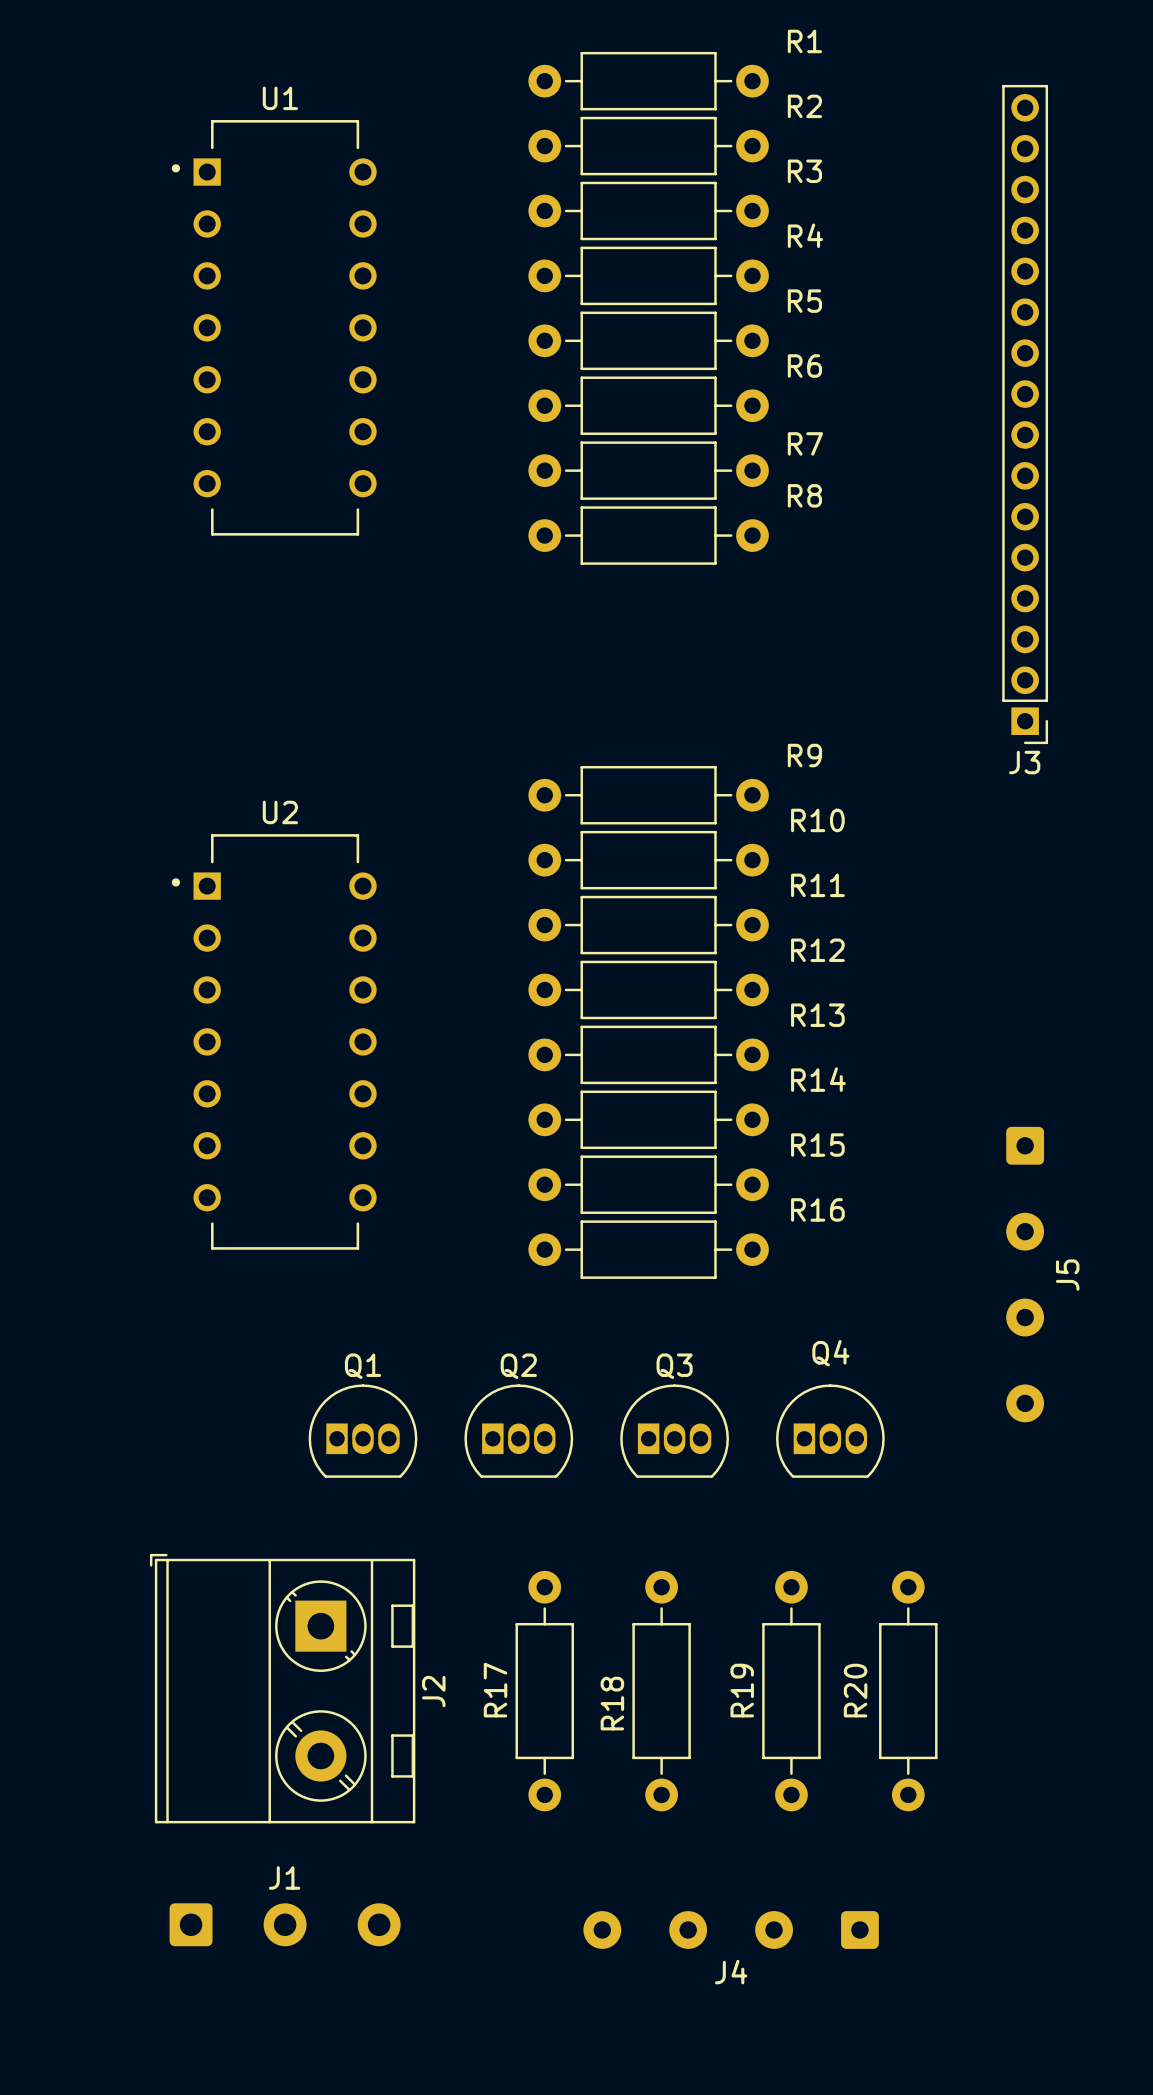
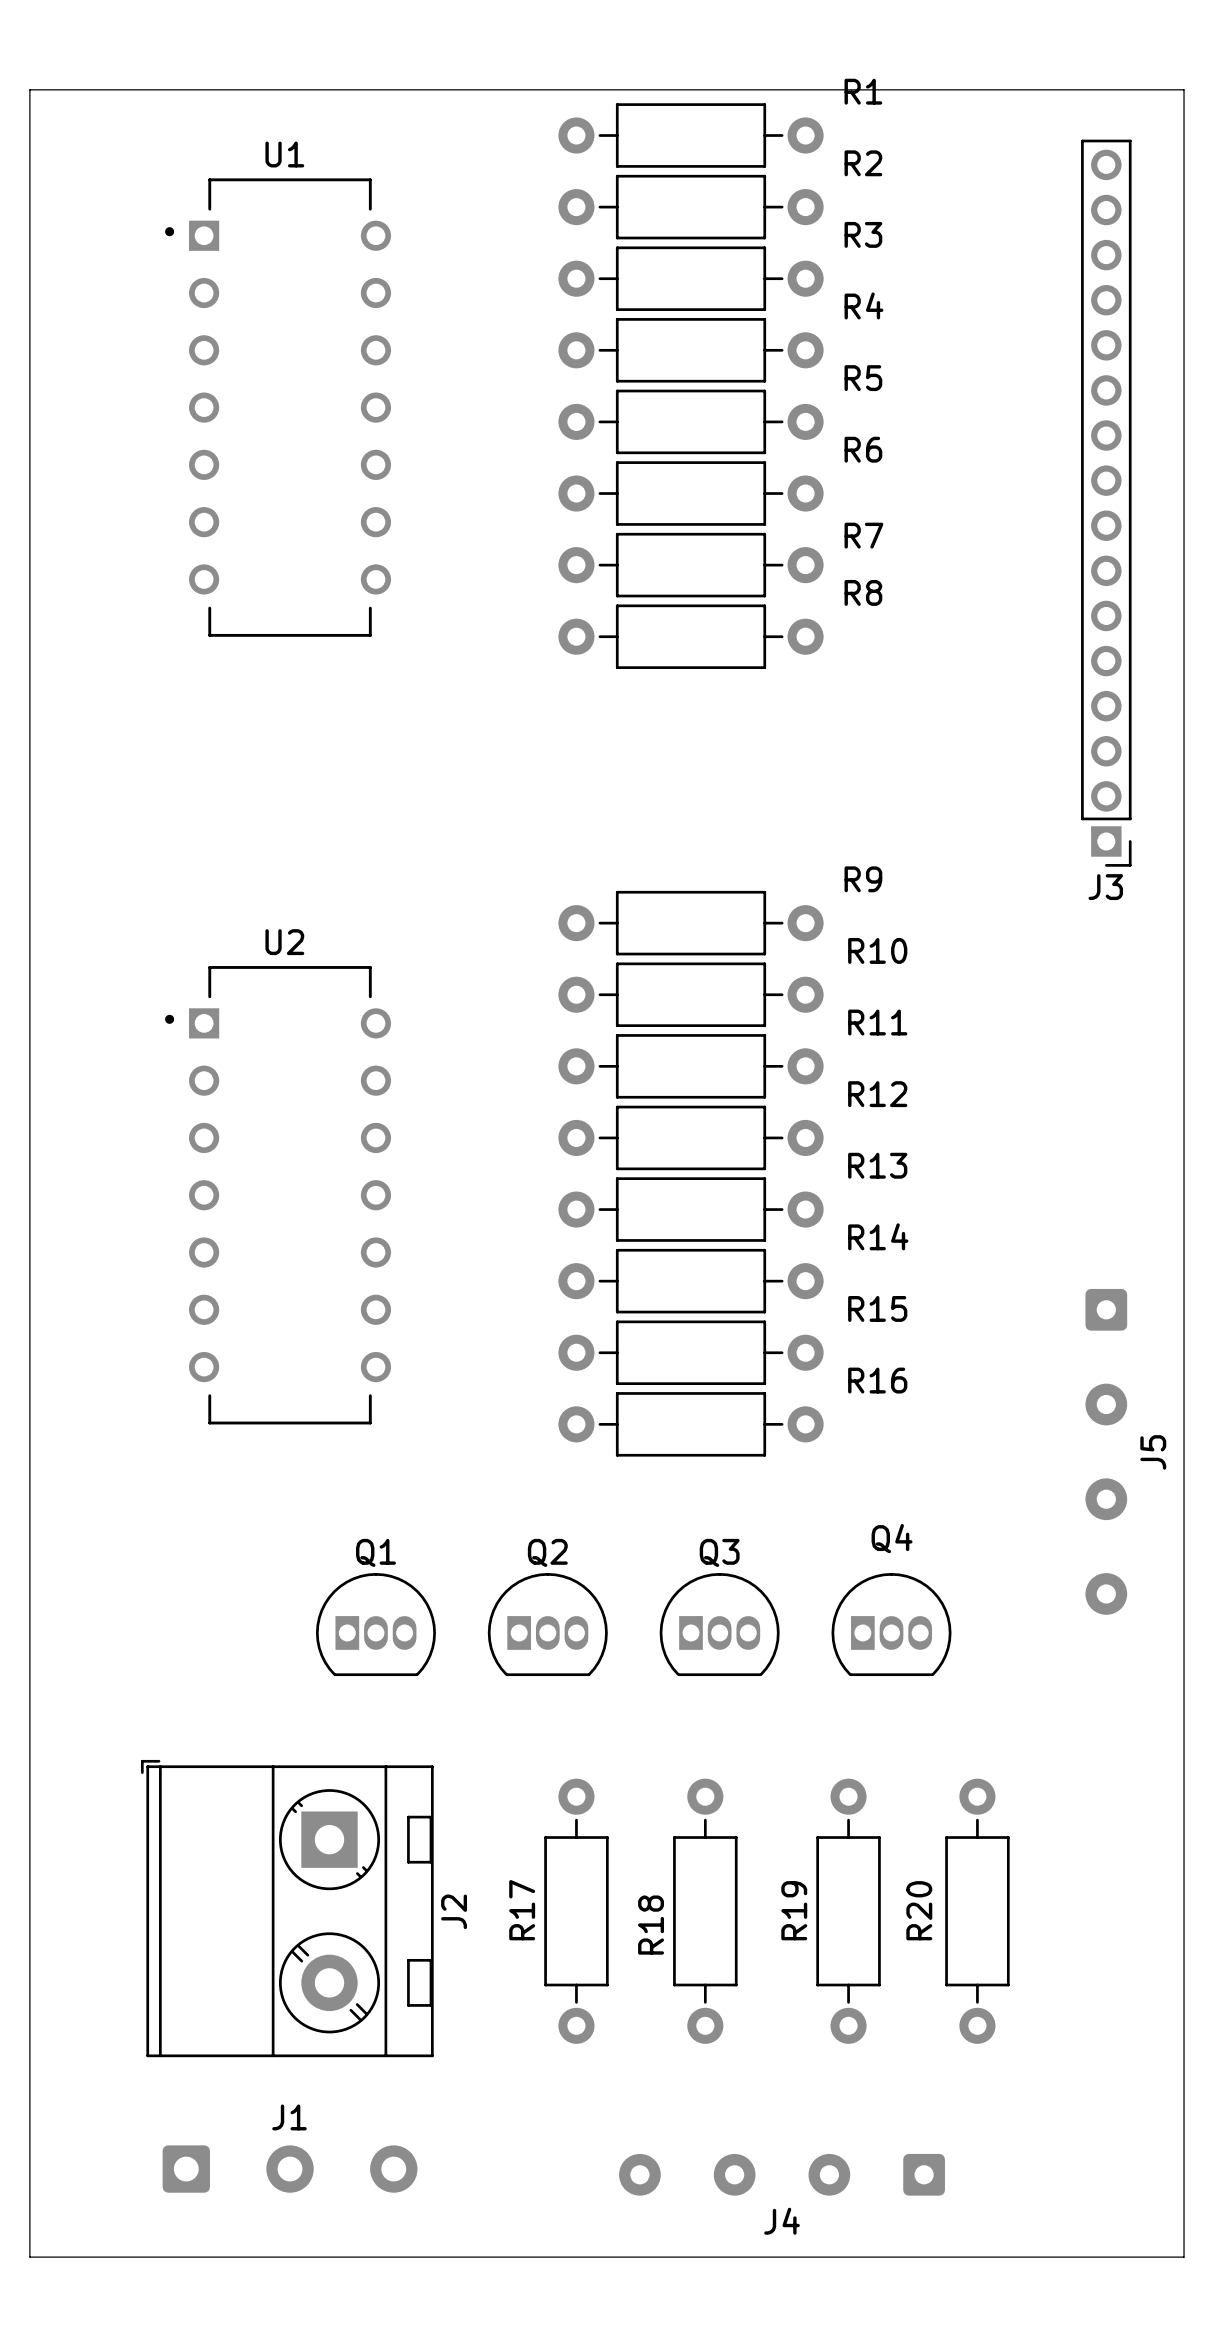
board edge: none -> (29, 89) (1184, 89) (1184, 2257) (29, 2257) (29, 89)

